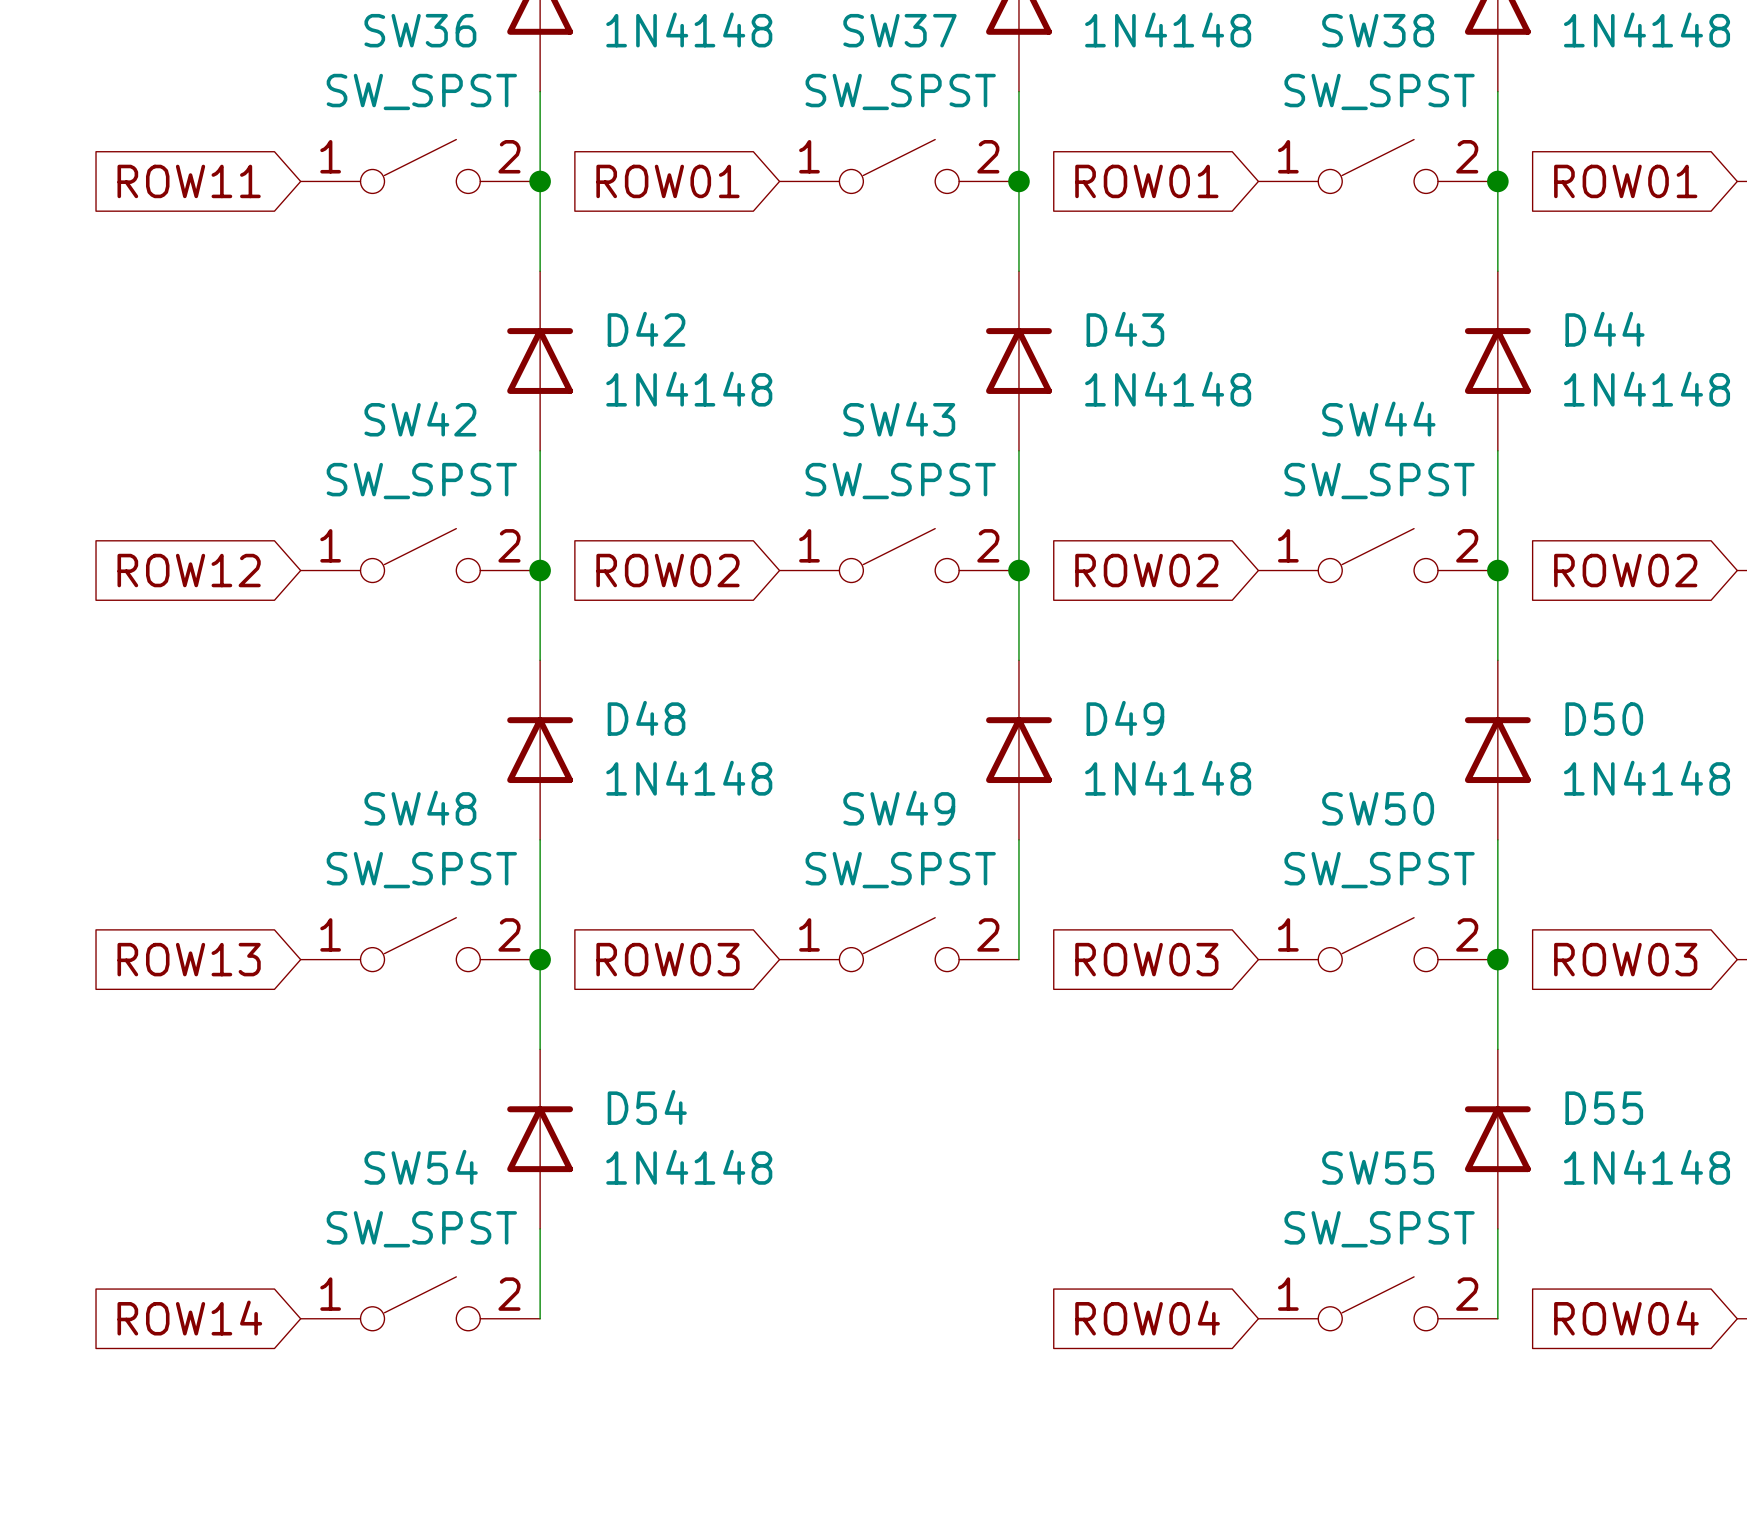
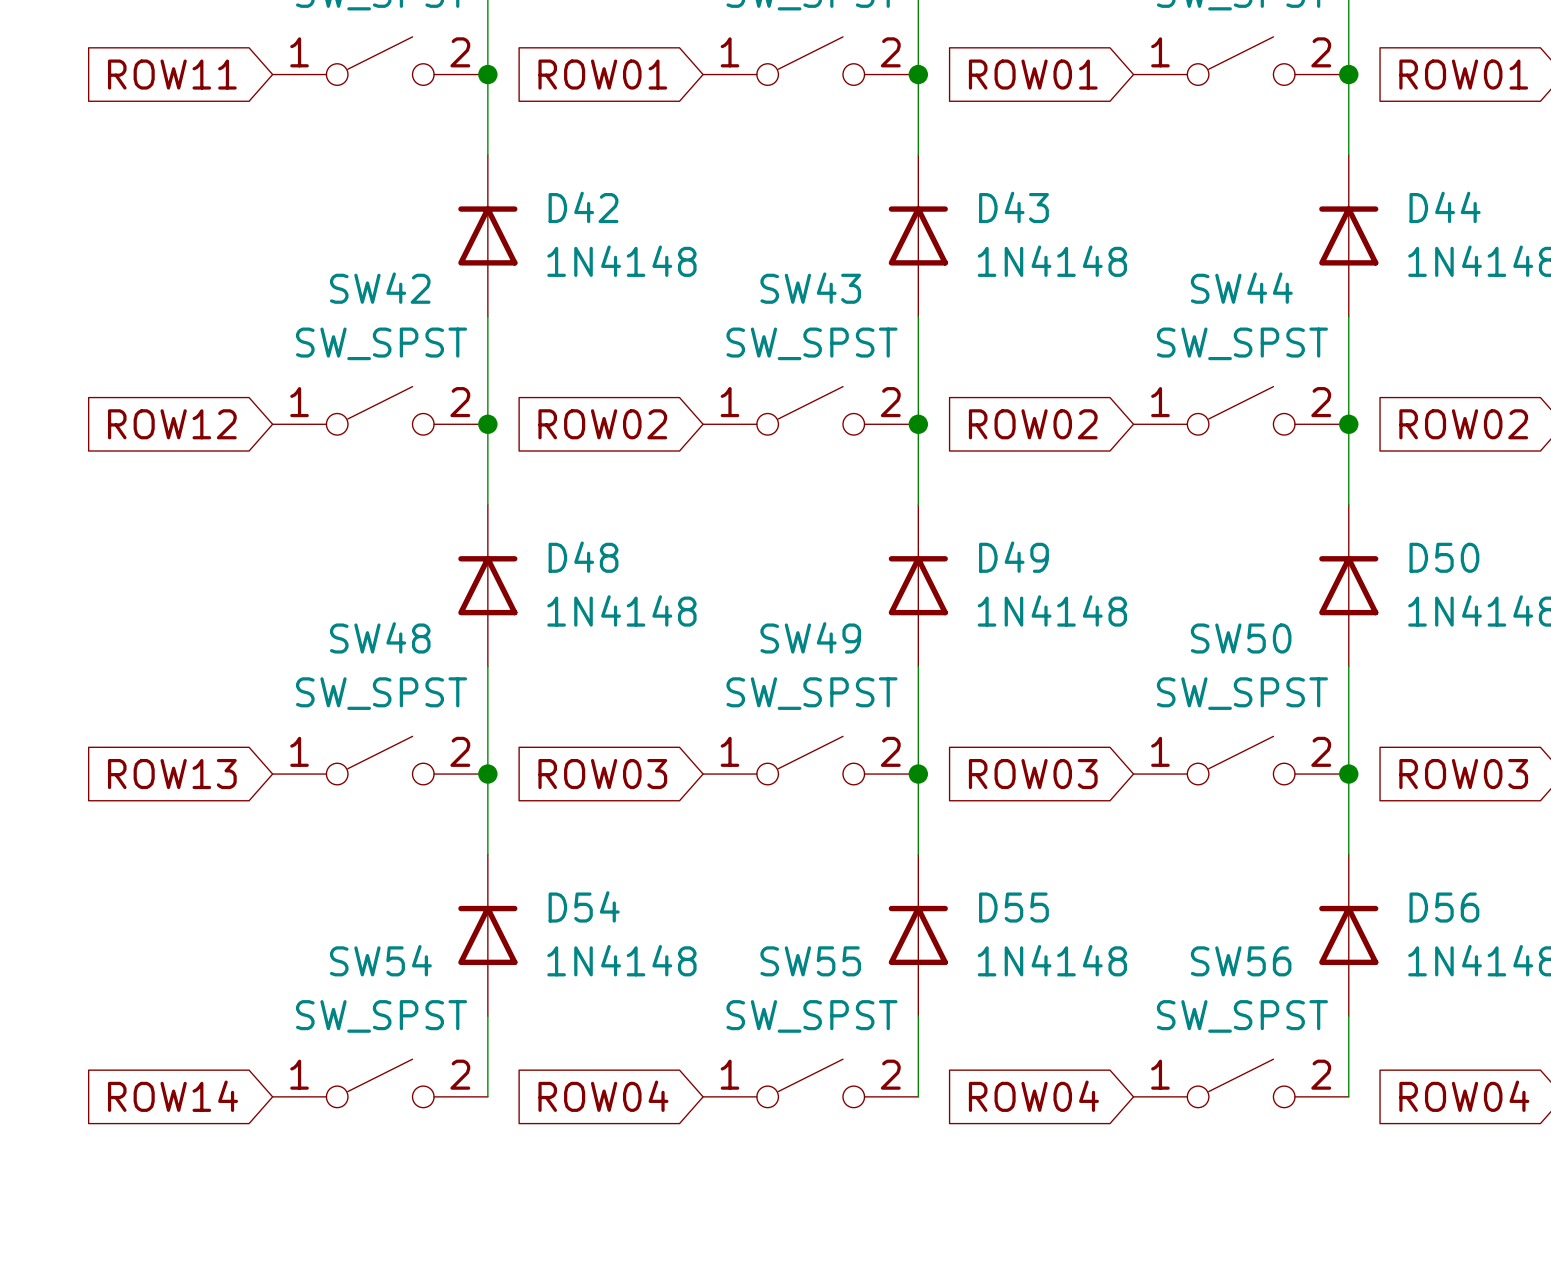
wire: none -> (918, 774) (918, 854)
junction: none -> (918, 774)
D55 name: D55 (1604, 1108) -> D56 (1444, 907)
D55: none -> 1N4148 (918, 935)
SW55 name: SW55 (1378, 1168) -> SW56 (1241, 961)
wire: none -> (918, 1016) (918, 1096)
SW55: none -> SW_SPST (810, 1083)
global label: none -> ROW04 (603, 1096)

